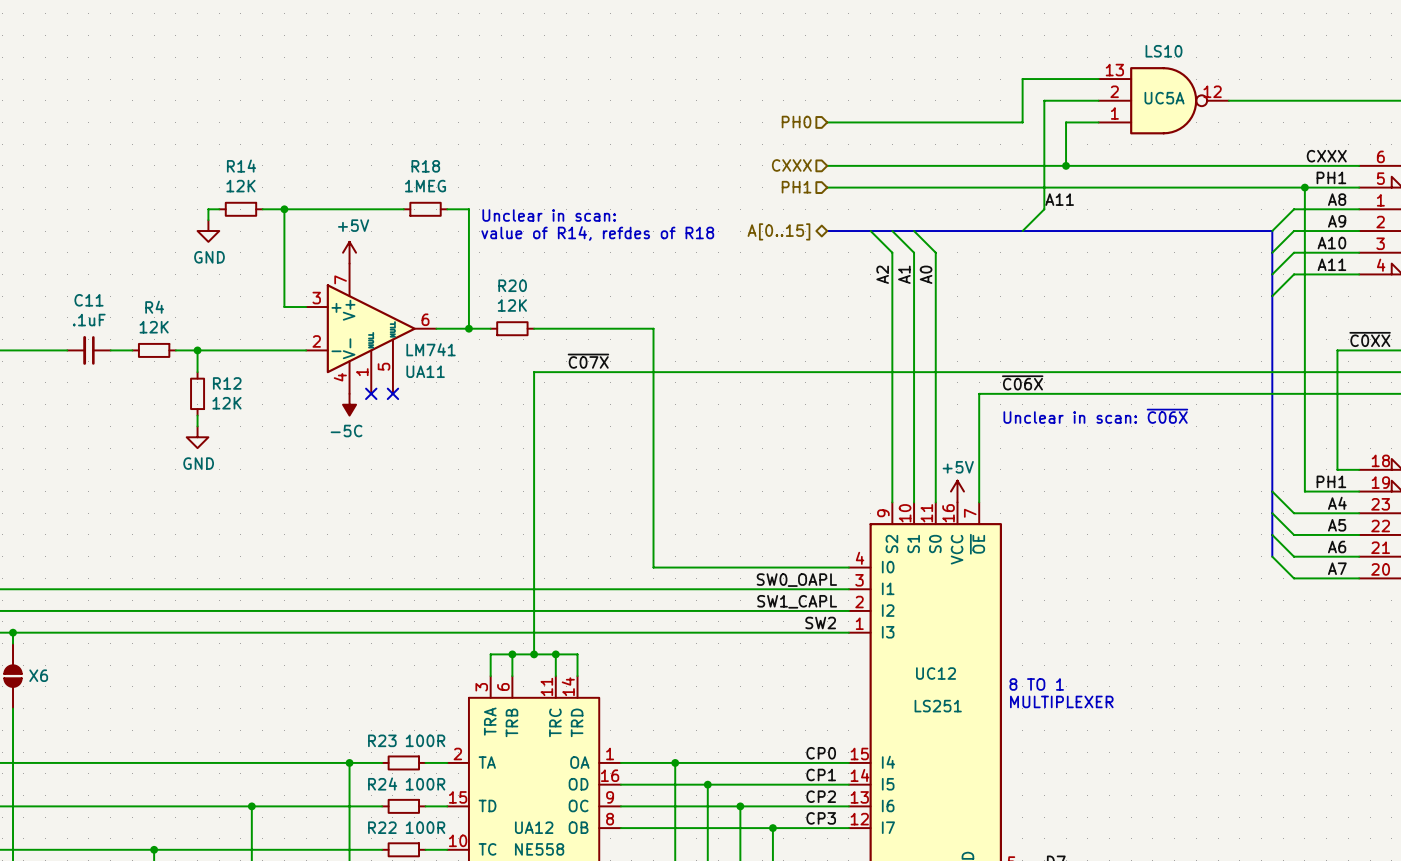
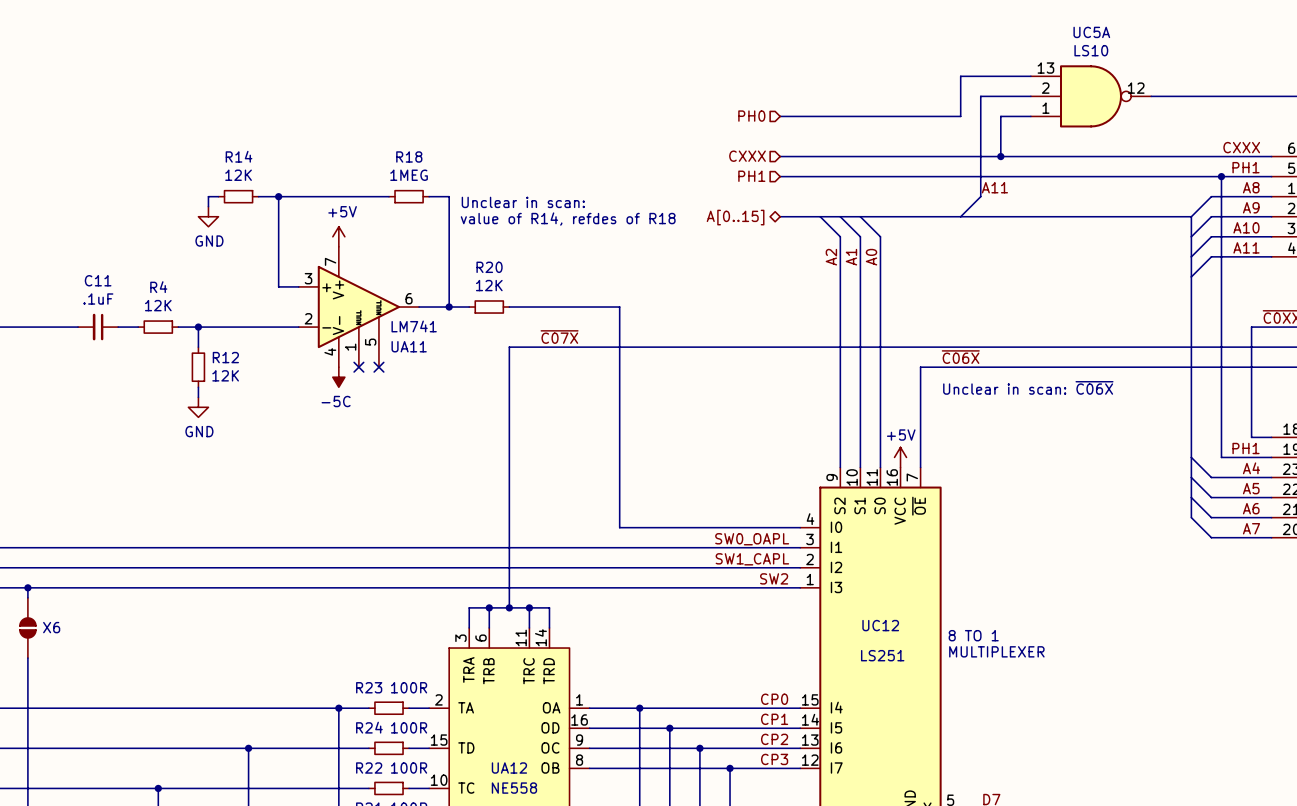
UC5A name position: UC5A (1164, 98) -> UC5A (1091, 32)

